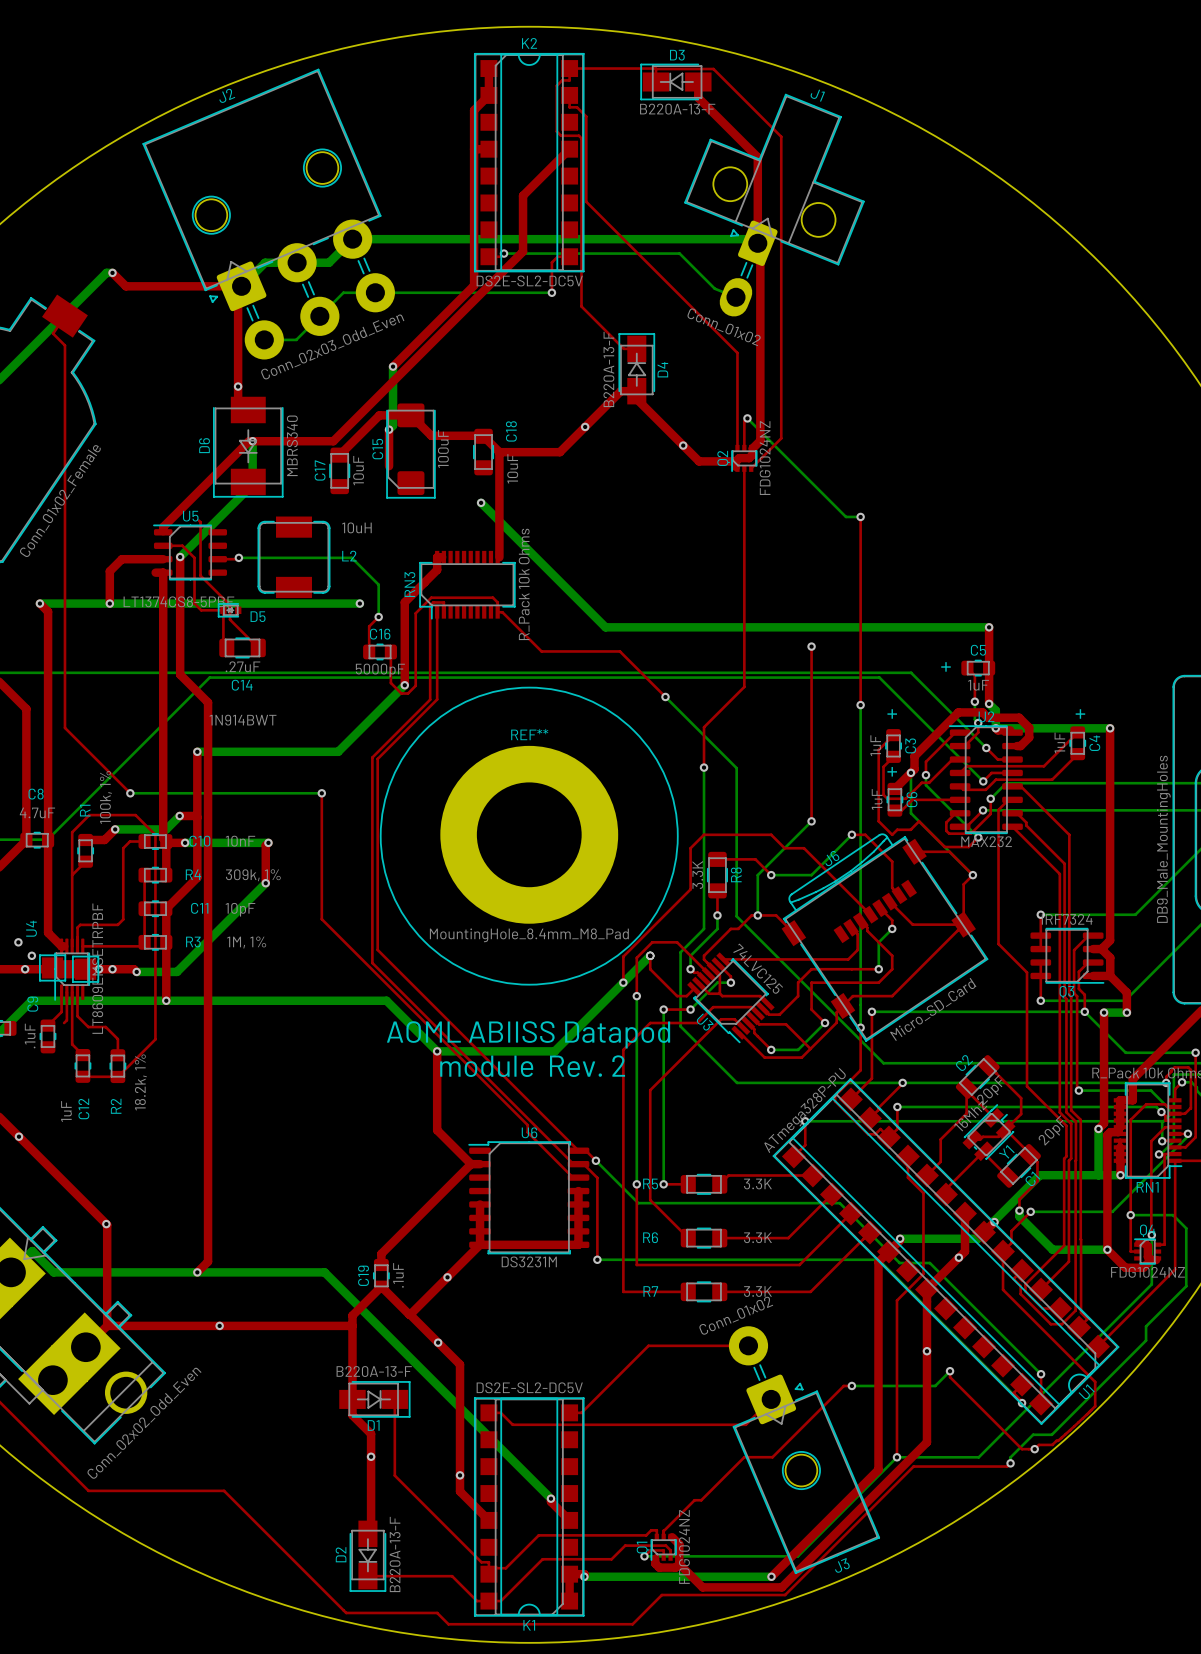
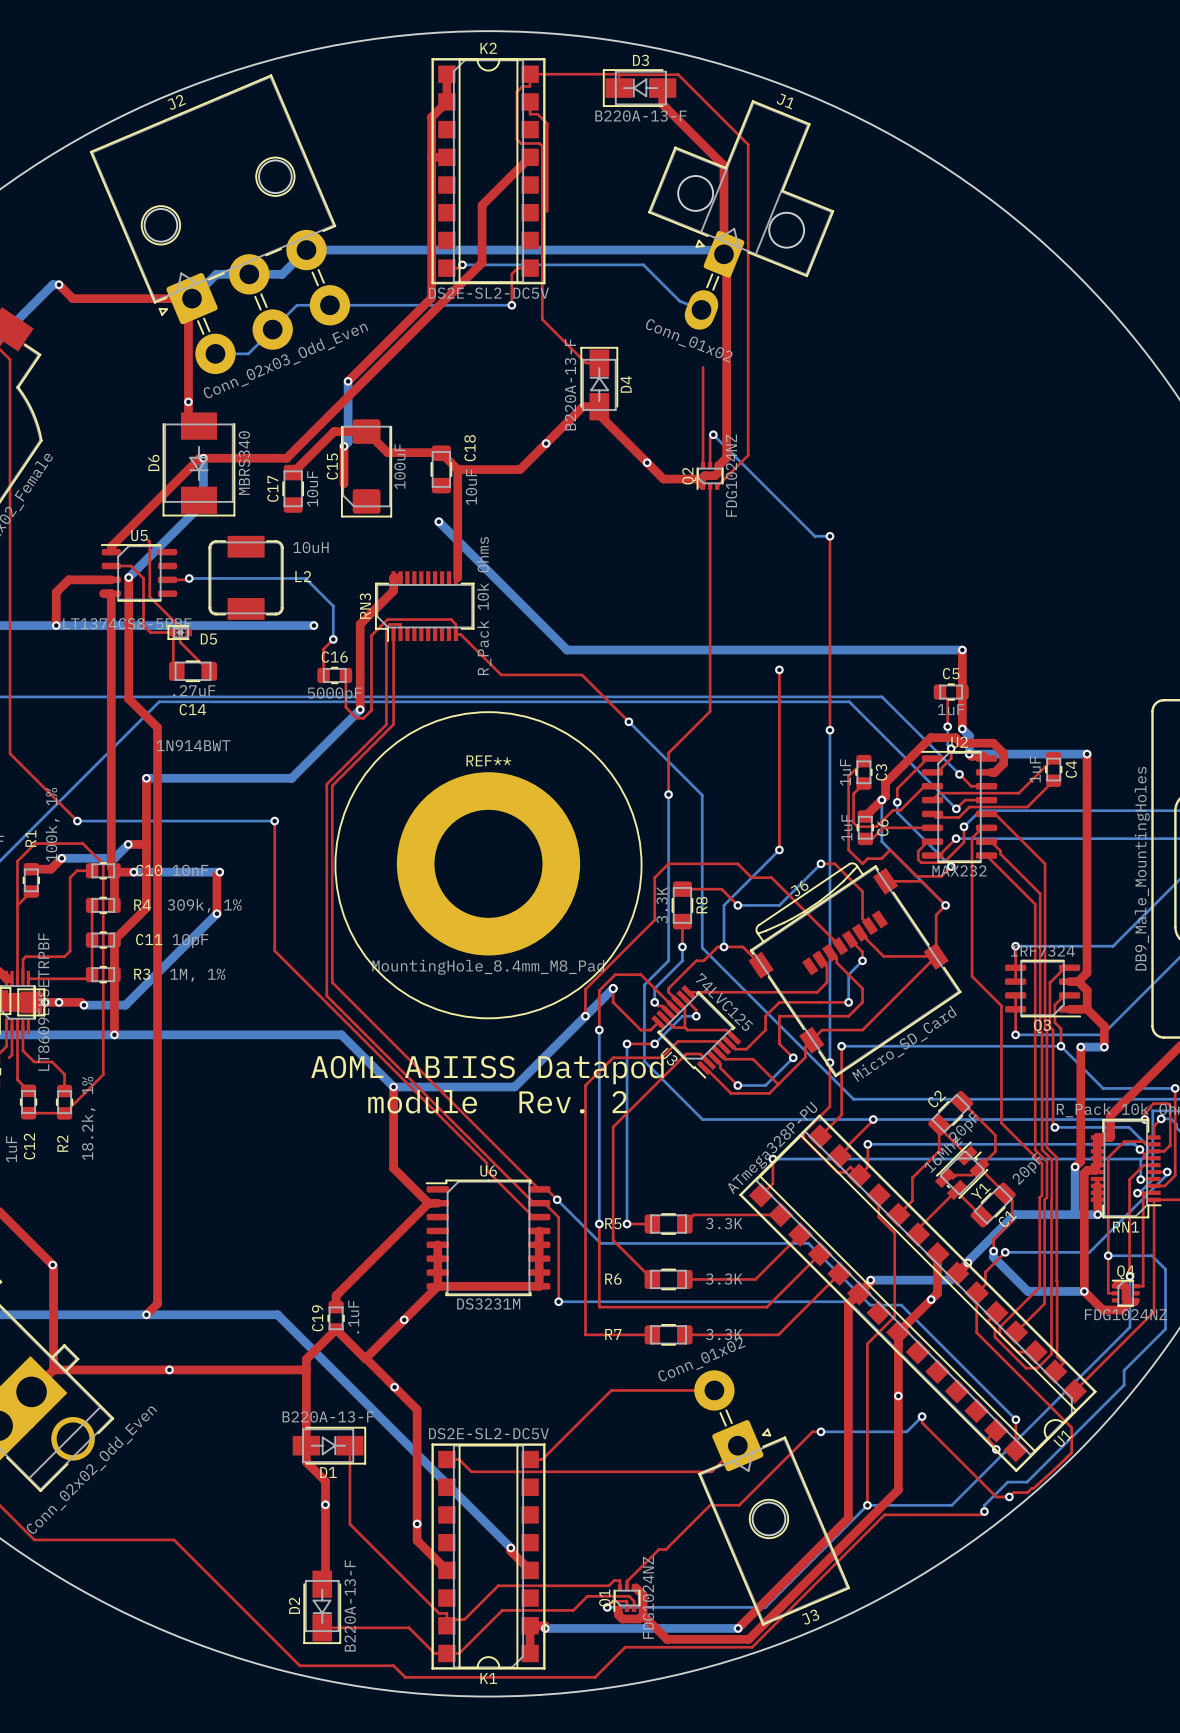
top track: (586, 201) (737, 352) -> none
text: + (946, 666) -> none
text: + (892, 713) -> none
text: + (1080, 713) -> none
text: + (892, 771) -> none

